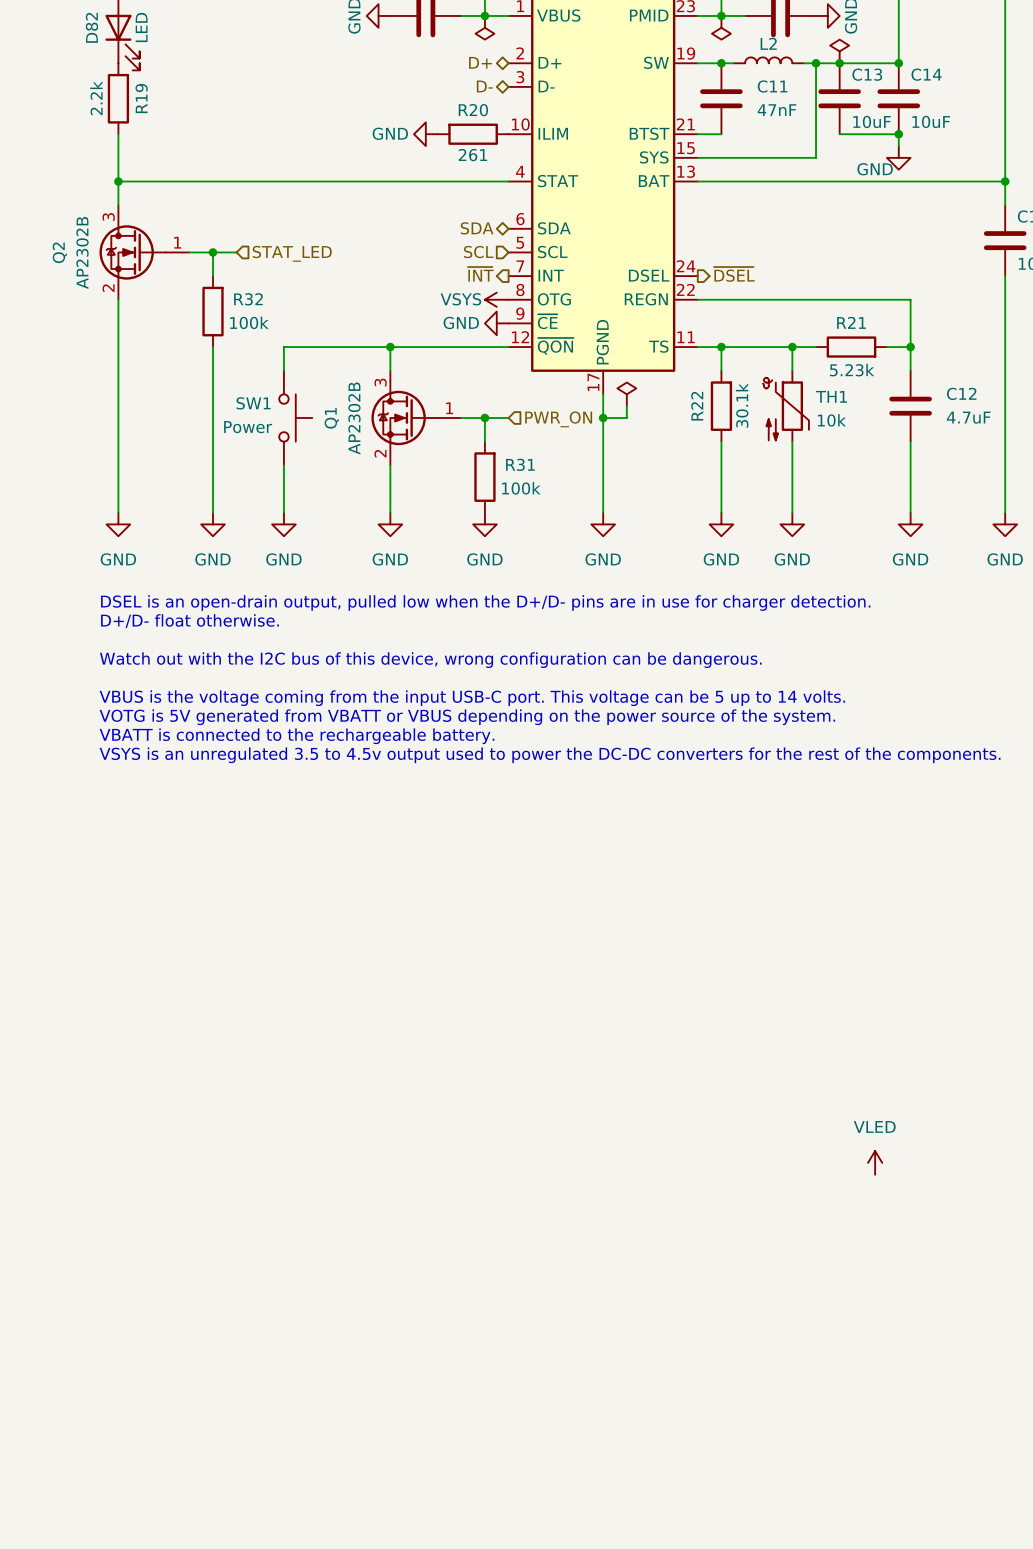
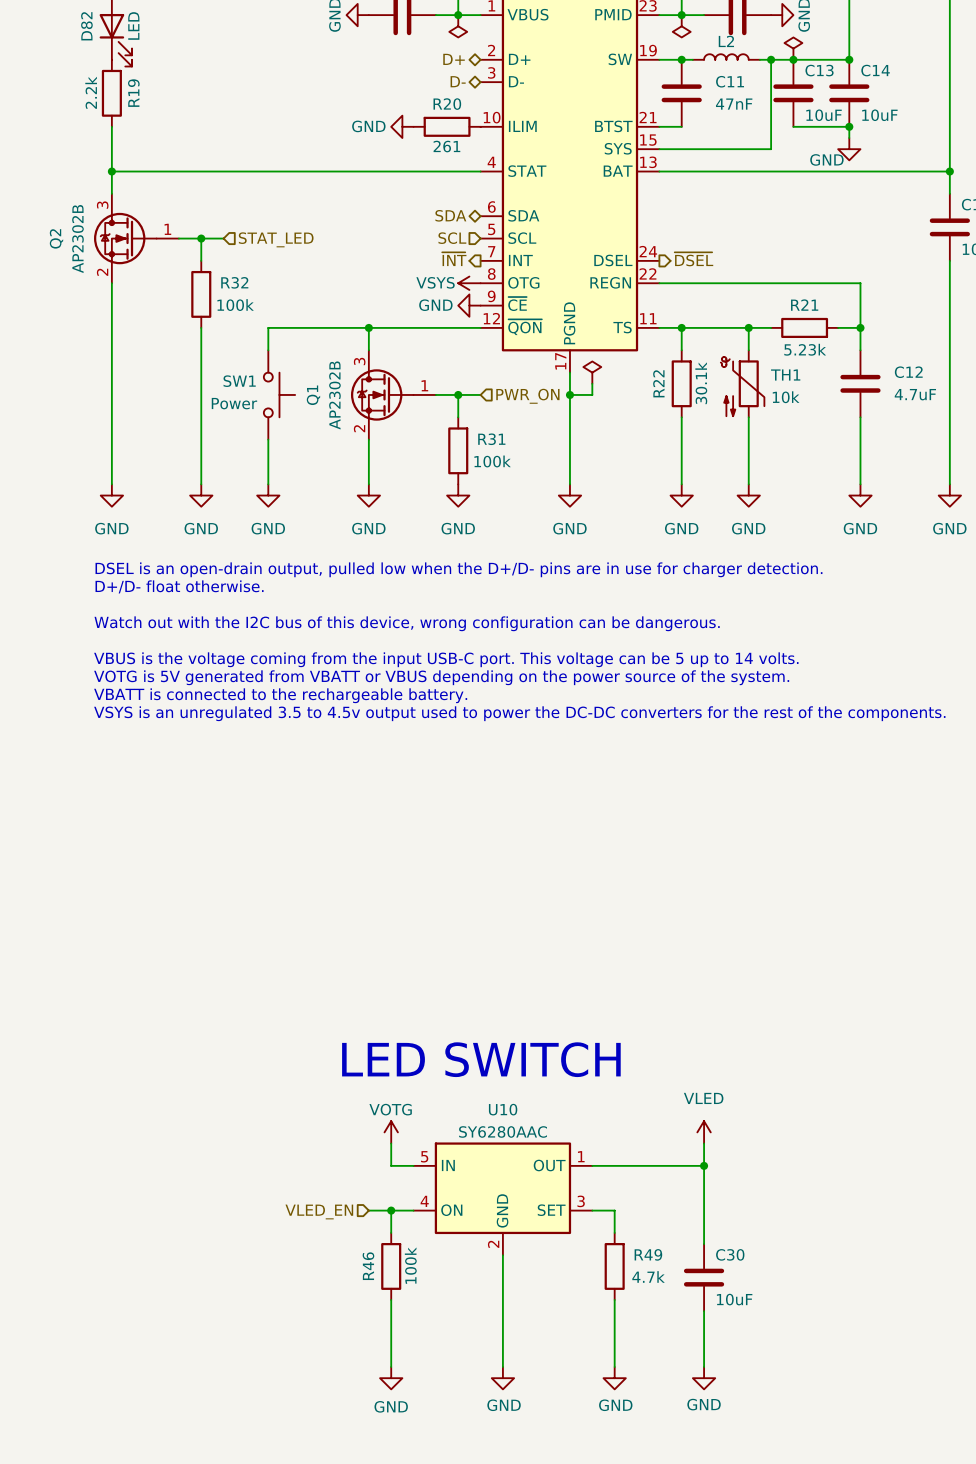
text: none -> LED SWITCH (481, 1059)
power symbol position: VLED (875, 1162) -> VLED (704, 1132)
power symbol: none -> VOTG (391, 1132)
wire: none -> (391, 1143) (391, 1165) (413, 1165)
wire: none -> (704, 1143) (704, 1244)
wire: none -> (592, 1165) (704, 1165)
junction: none -> (704, 1165)
U10: none -> SY6280AAC (502, 1198)
wire: none -> (368, 1210) (413, 1210)
wire: none -> (391, 1210) (391, 1232)
junction: none -> (391, 1210)
wire: none -> (592, 1210) (614, 1210) (614, 1232)
hierarchical label: none -> VLED_EN (319, 1211)
wire: none -> (502, 1255) (502, 1367)
R46: none -> 100k (391, 1266)
R49: none -> 4.7k (614, 1266)
C30: none -> 10uF (704, 1277)
wire: none -> (391, 1299) (391, 1367)
wire: none -> (614, 1299) (614, 1367)
wire: none -> (704, 1311) (704, 1367)
power symbol: none -> GND (391, 1378)
power symbol: none -> GND (502, 1378)
power symbol: none -> GND (614, 1378)
power symbol: none -> GND (704, 1378)

